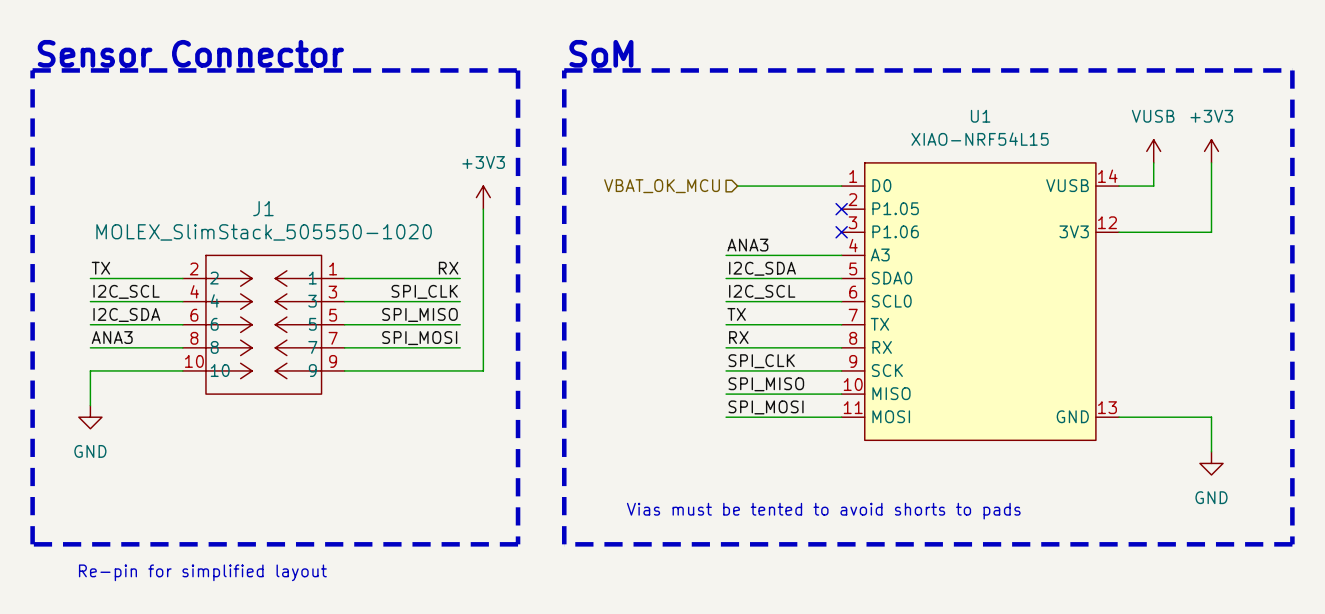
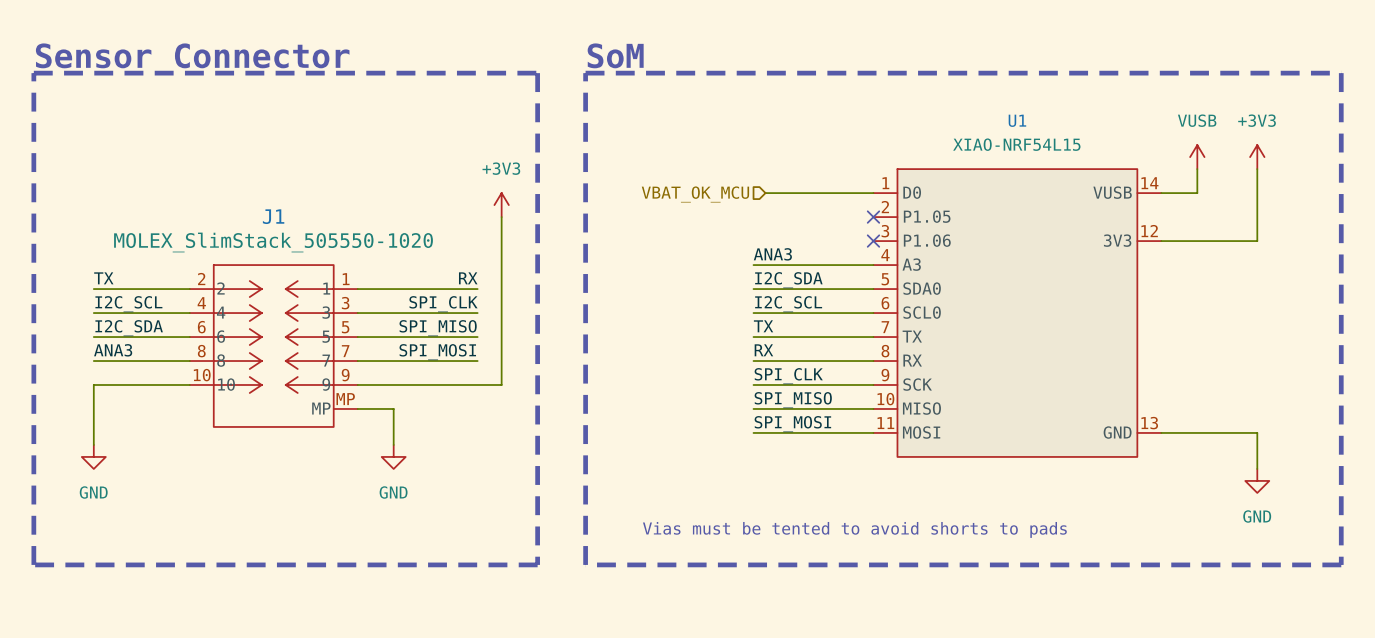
J1 symbol: [182, 255, 345, 395] -> [189, 265, 358, 427]
wire: none -> (357, 408) (393, 408) (393, 444)
power symbol position: GND (90, 417) -> GND (93, 456)
power symbol: none -> GND (393, 456)
text: Re-pin for simplified layout (202, 572) -> none

